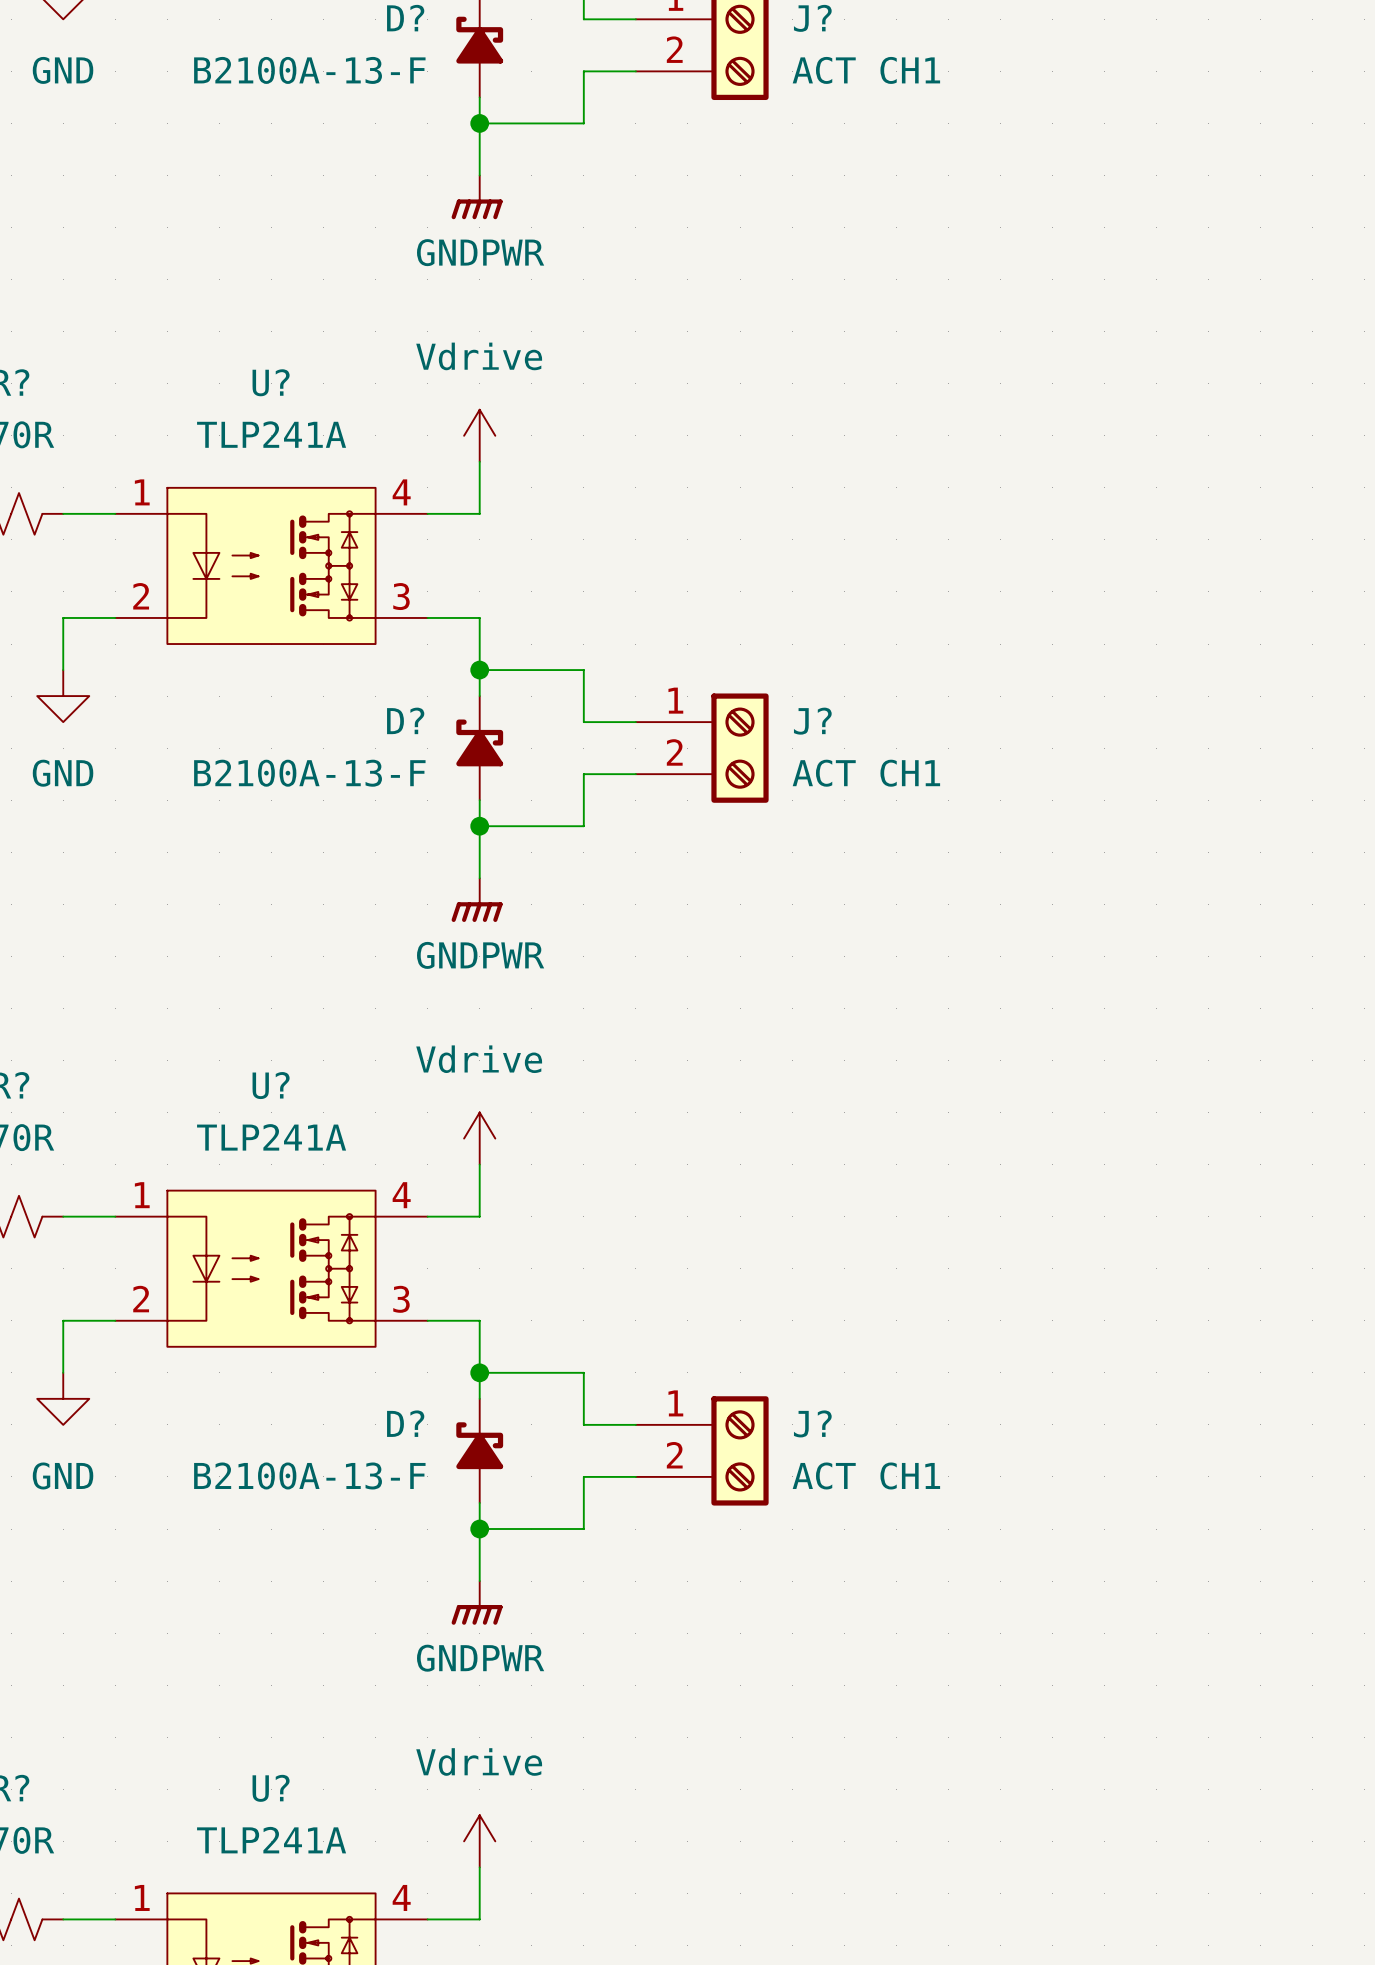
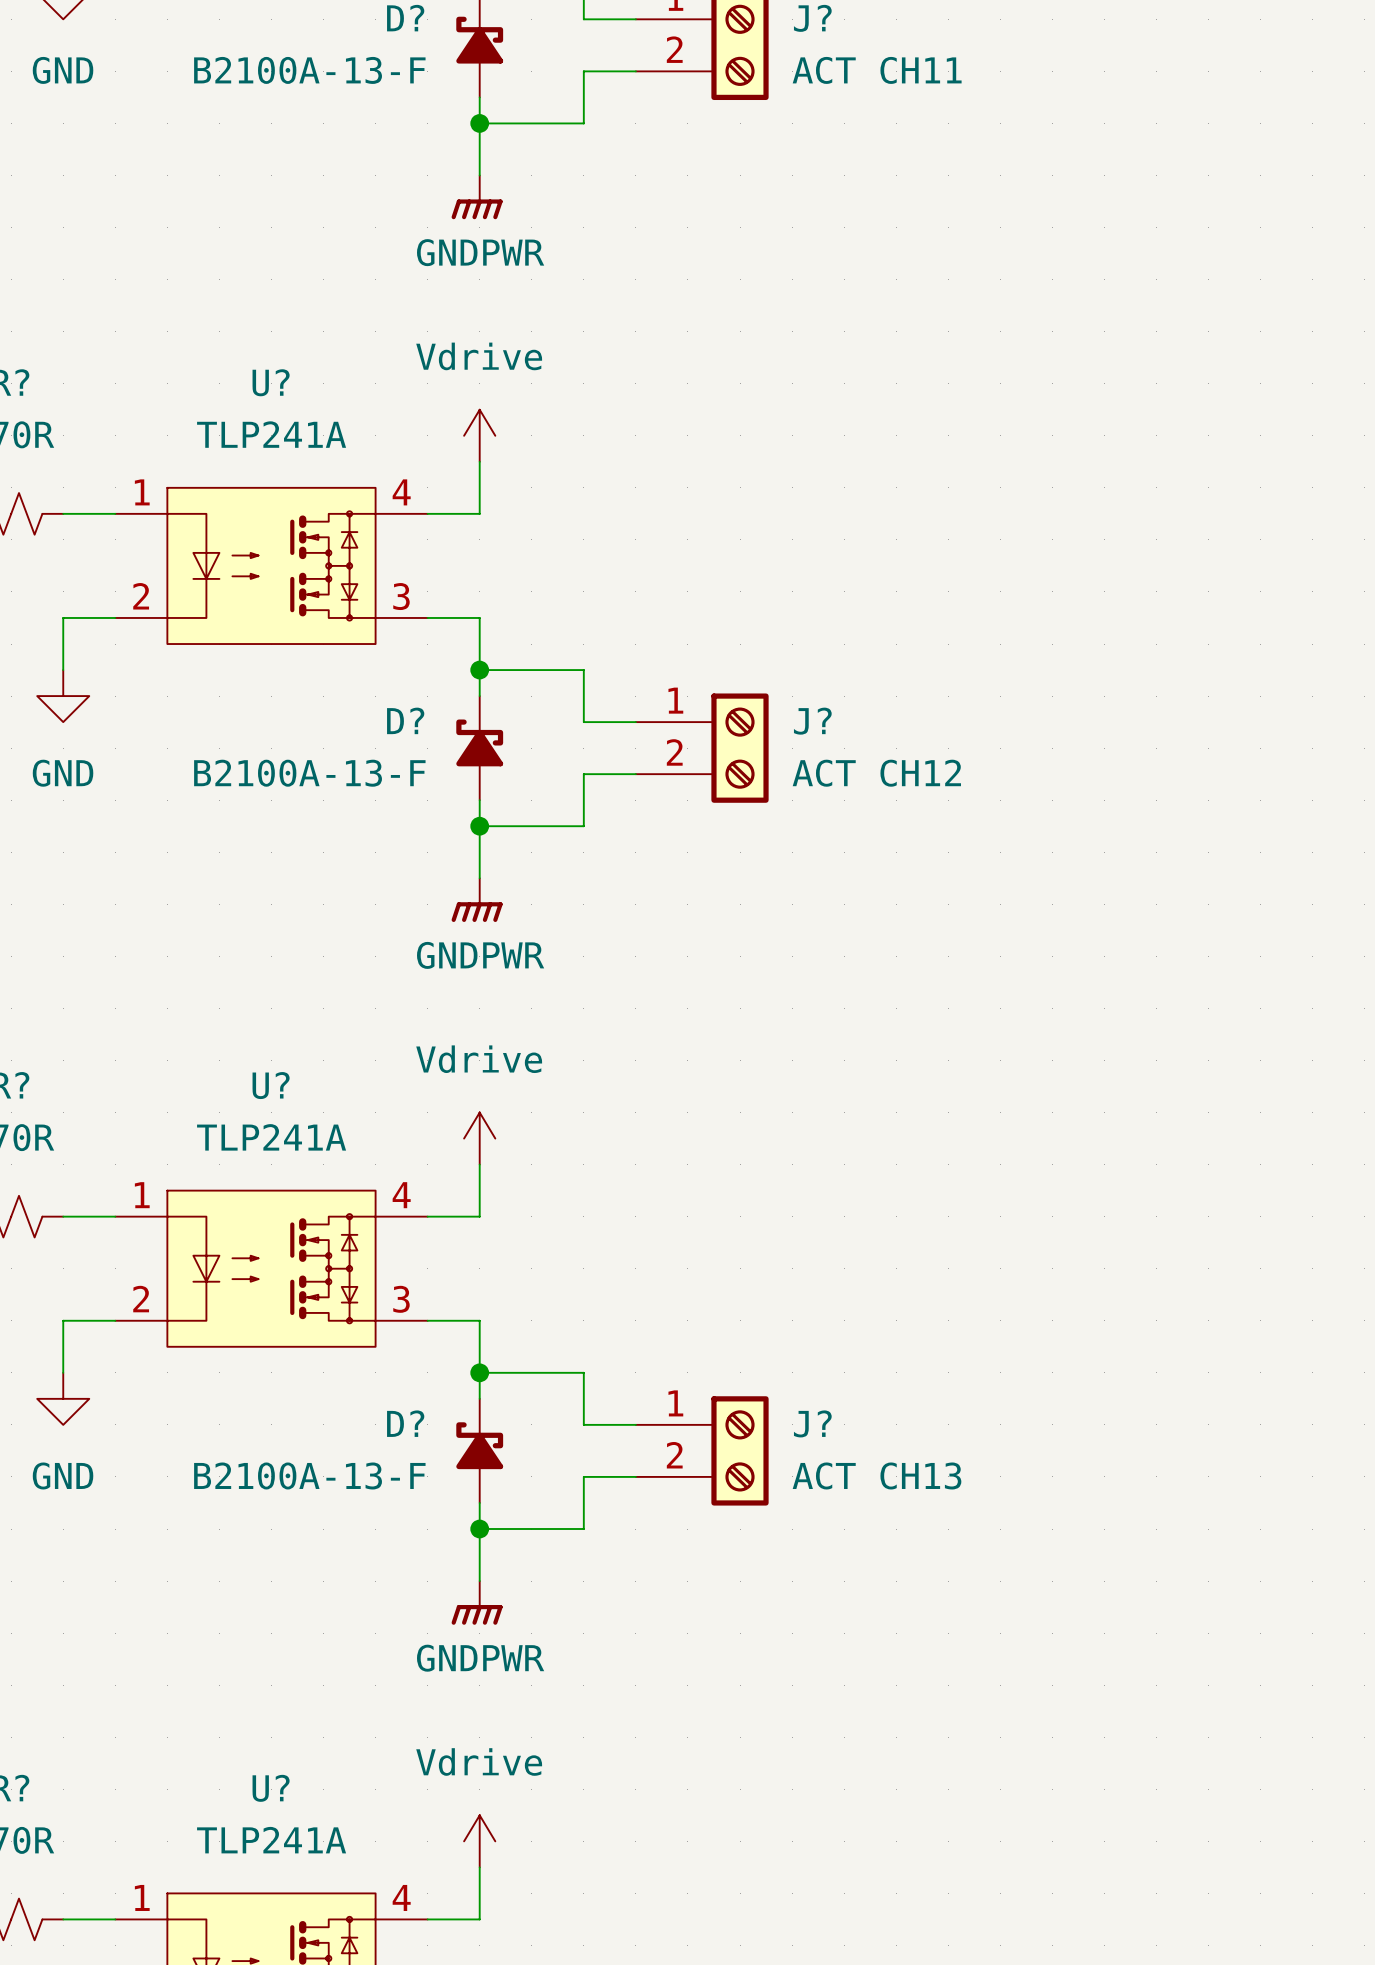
J? value: ACT CH1 (866, 70) -> ACT CH11 (877, 70)
J? value: ACT CH1 (866, 773) -> ACT CH12 (876, 773)
J? value: ACT CH1 (866, 1475) -> ACT CH13 (877, 1475)

